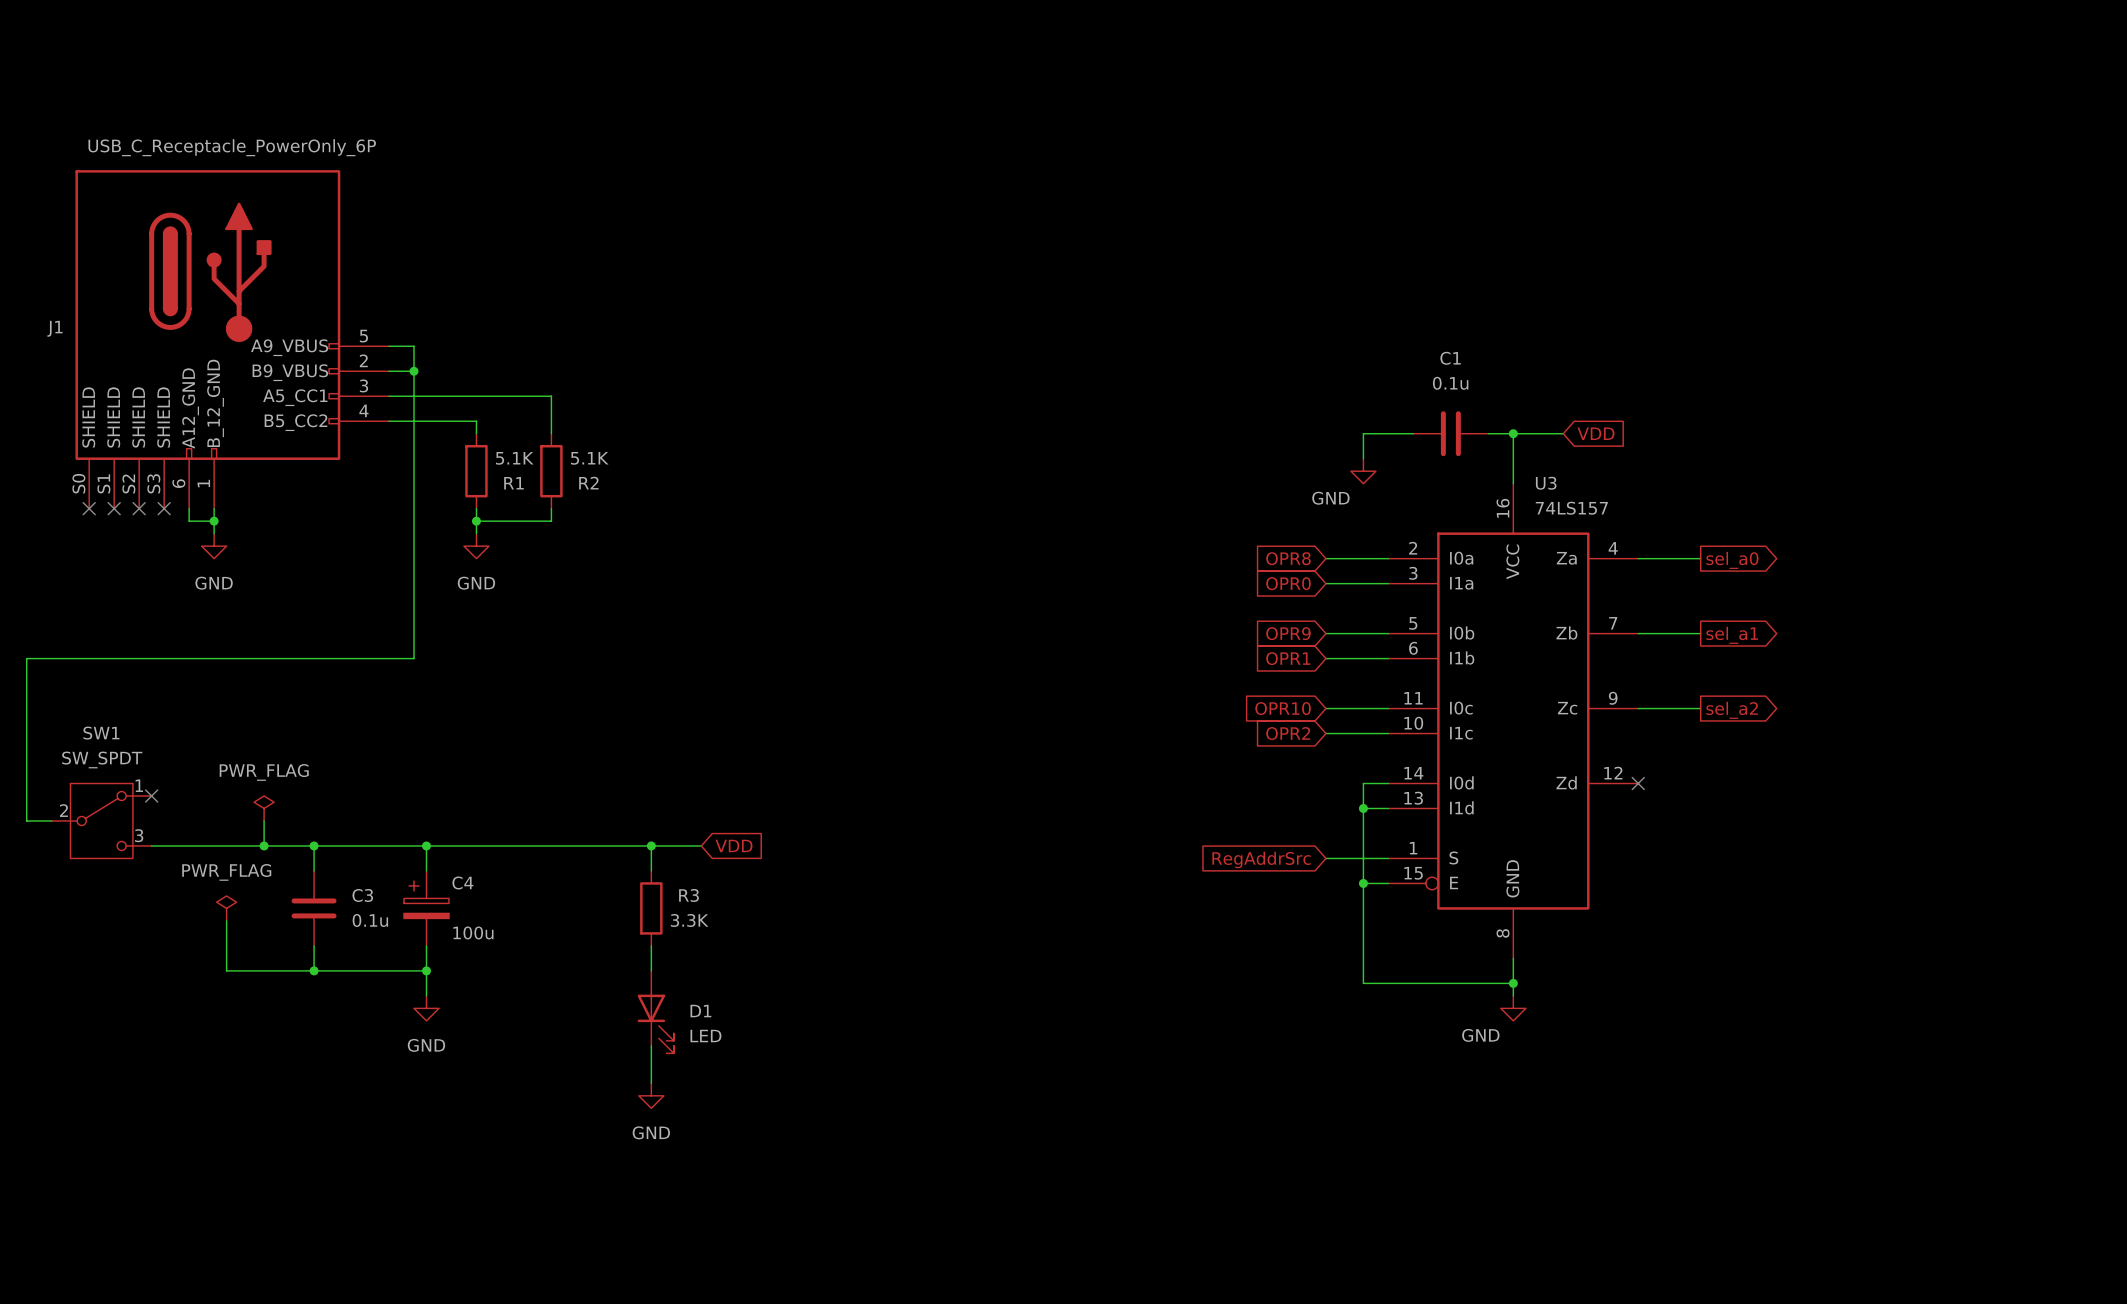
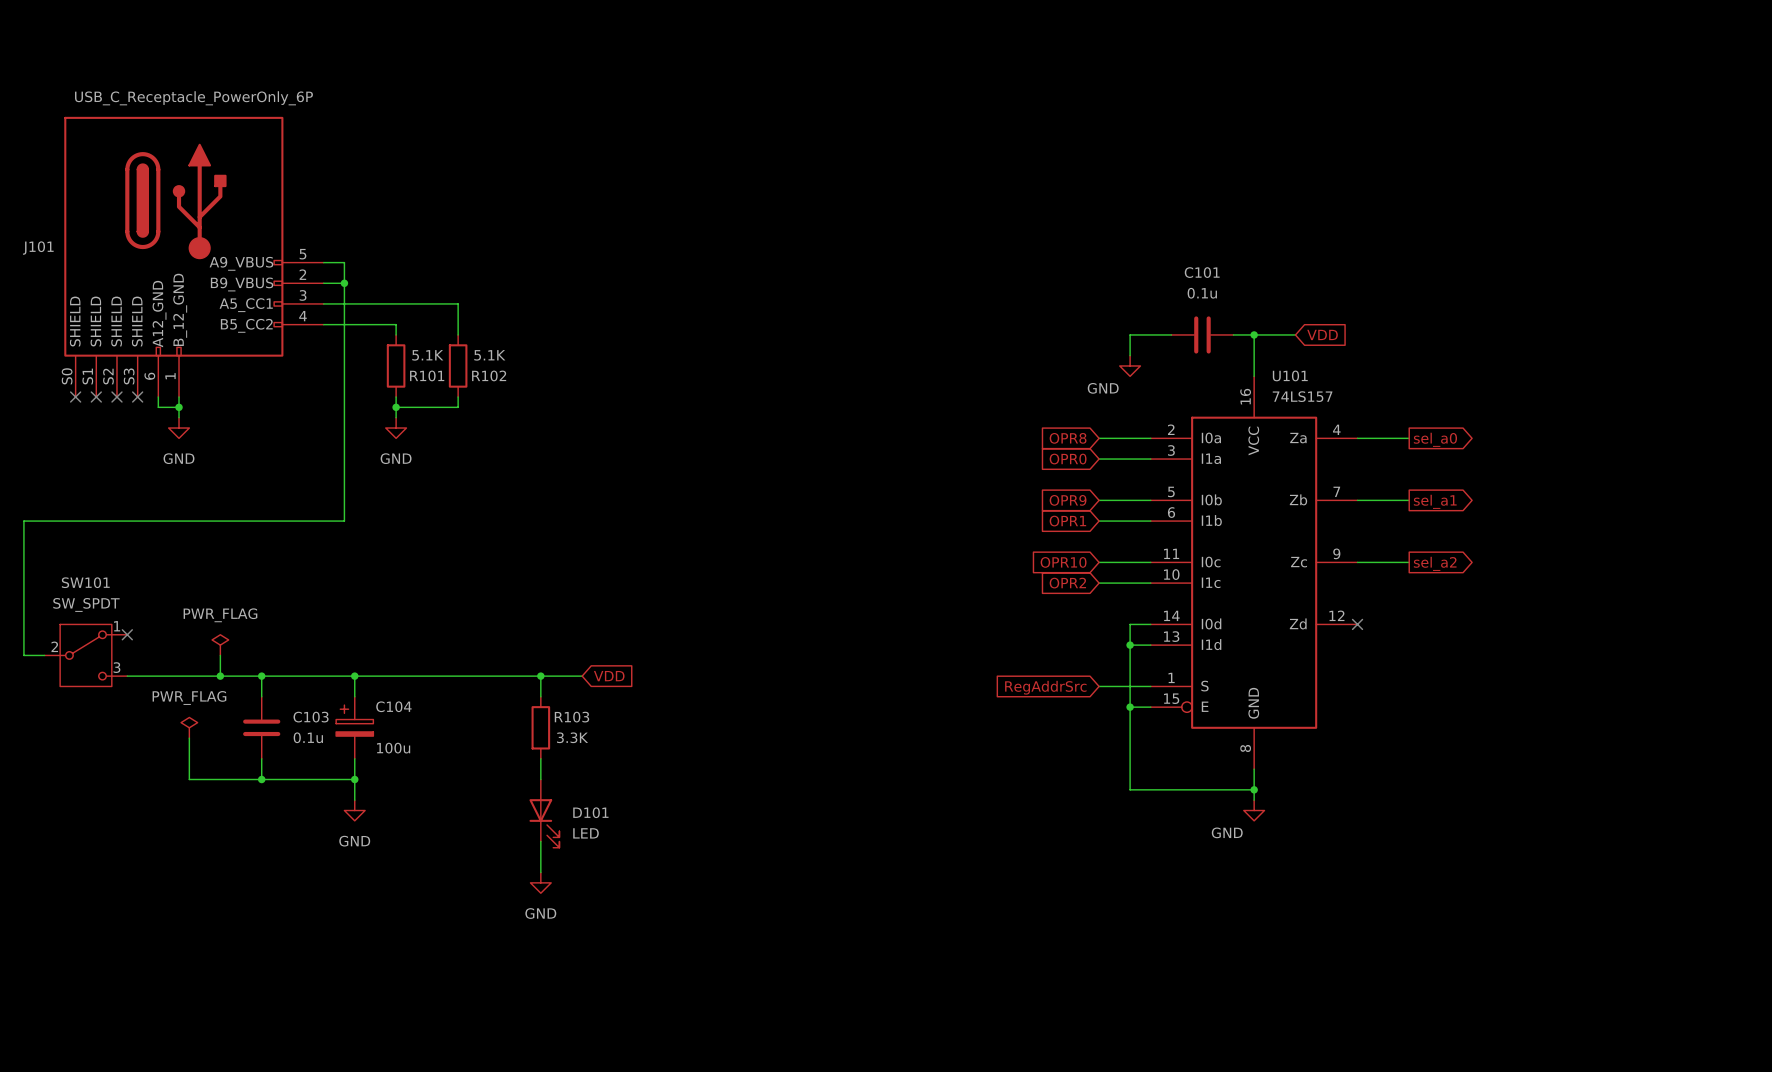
J1 name: J1 (54, 328) -> J101 (38, 248)
C1 name: C1 (1450, 358) -> C101 (1202, 272)
R1 name: R1 (513, 483) -> R101 (427, 375)
R2 name: R2 (588, 483) -> R102 (489, 375)
U3 name: U3 (1546, 483) -> U101 (1290, 375)
SW1 name: SW1 (101, 733) -> SW101 (85, 582)
C4 name: C4 (462, 882) -> C104 (393, 706)
C3 name: C3 (362, 895) -> C103 (311, 717)
R3 name: R3 (688, 895) -> R103 (571, 717)
D1 name: D1 (700, 1011) -> D101 (590, 812)

